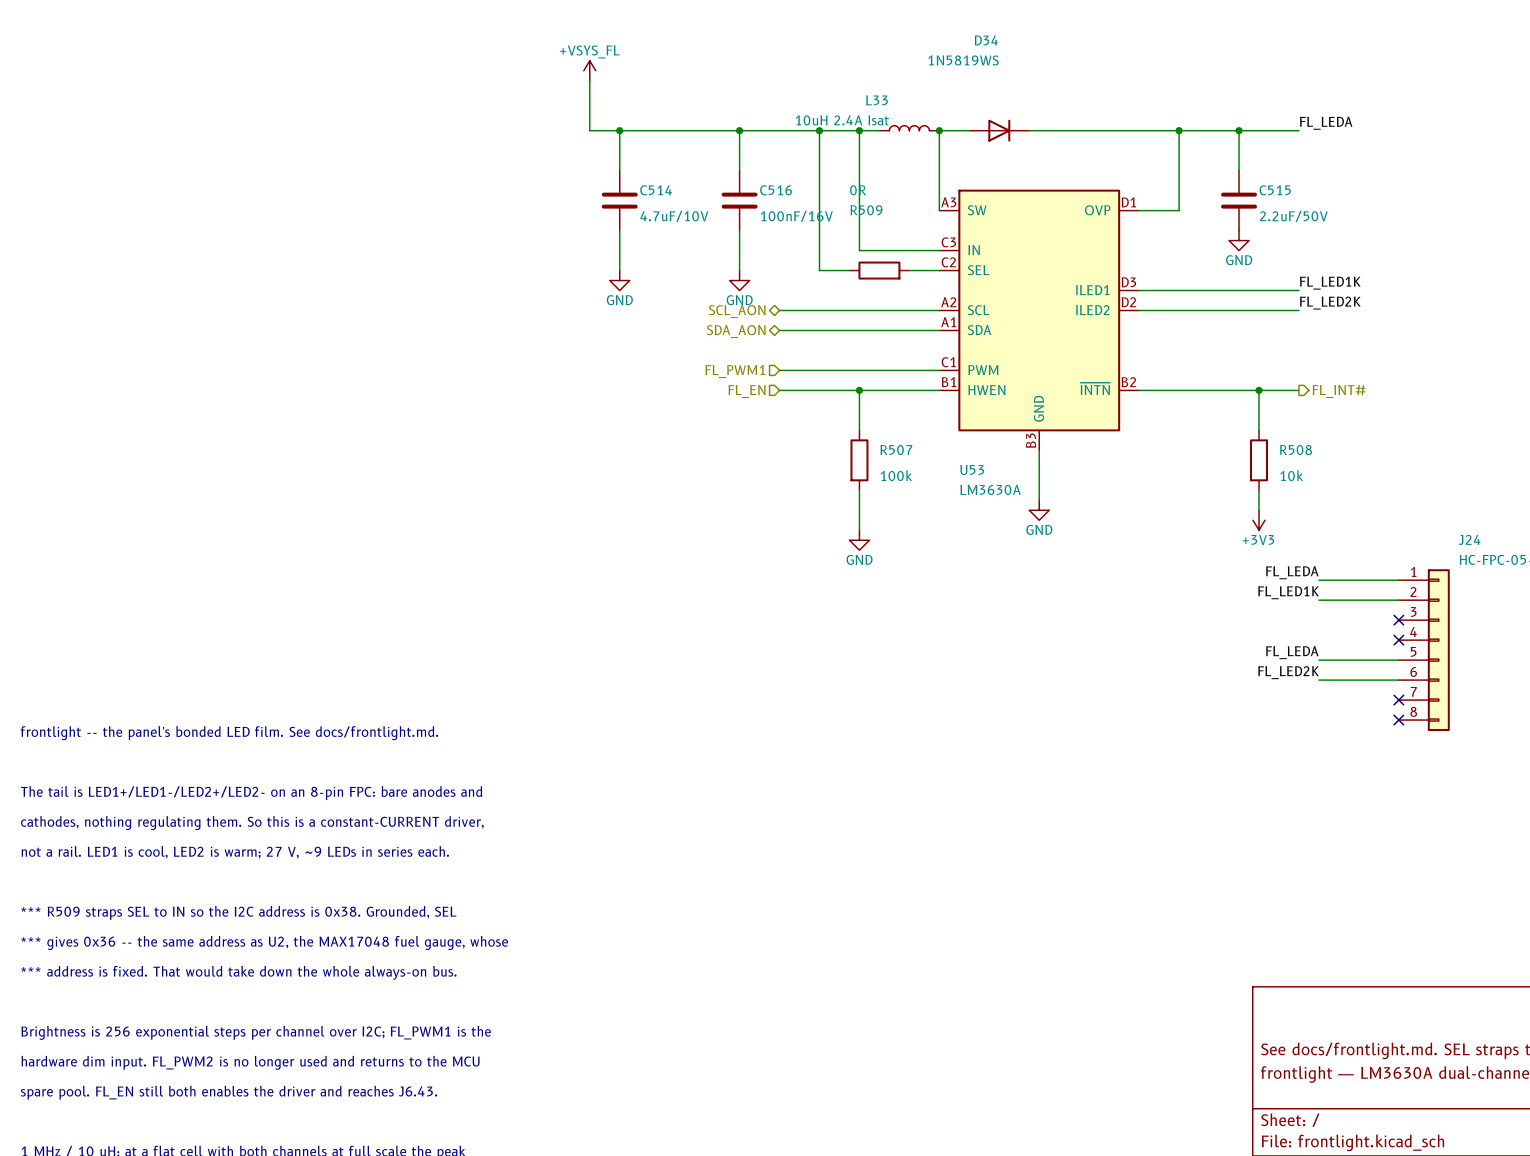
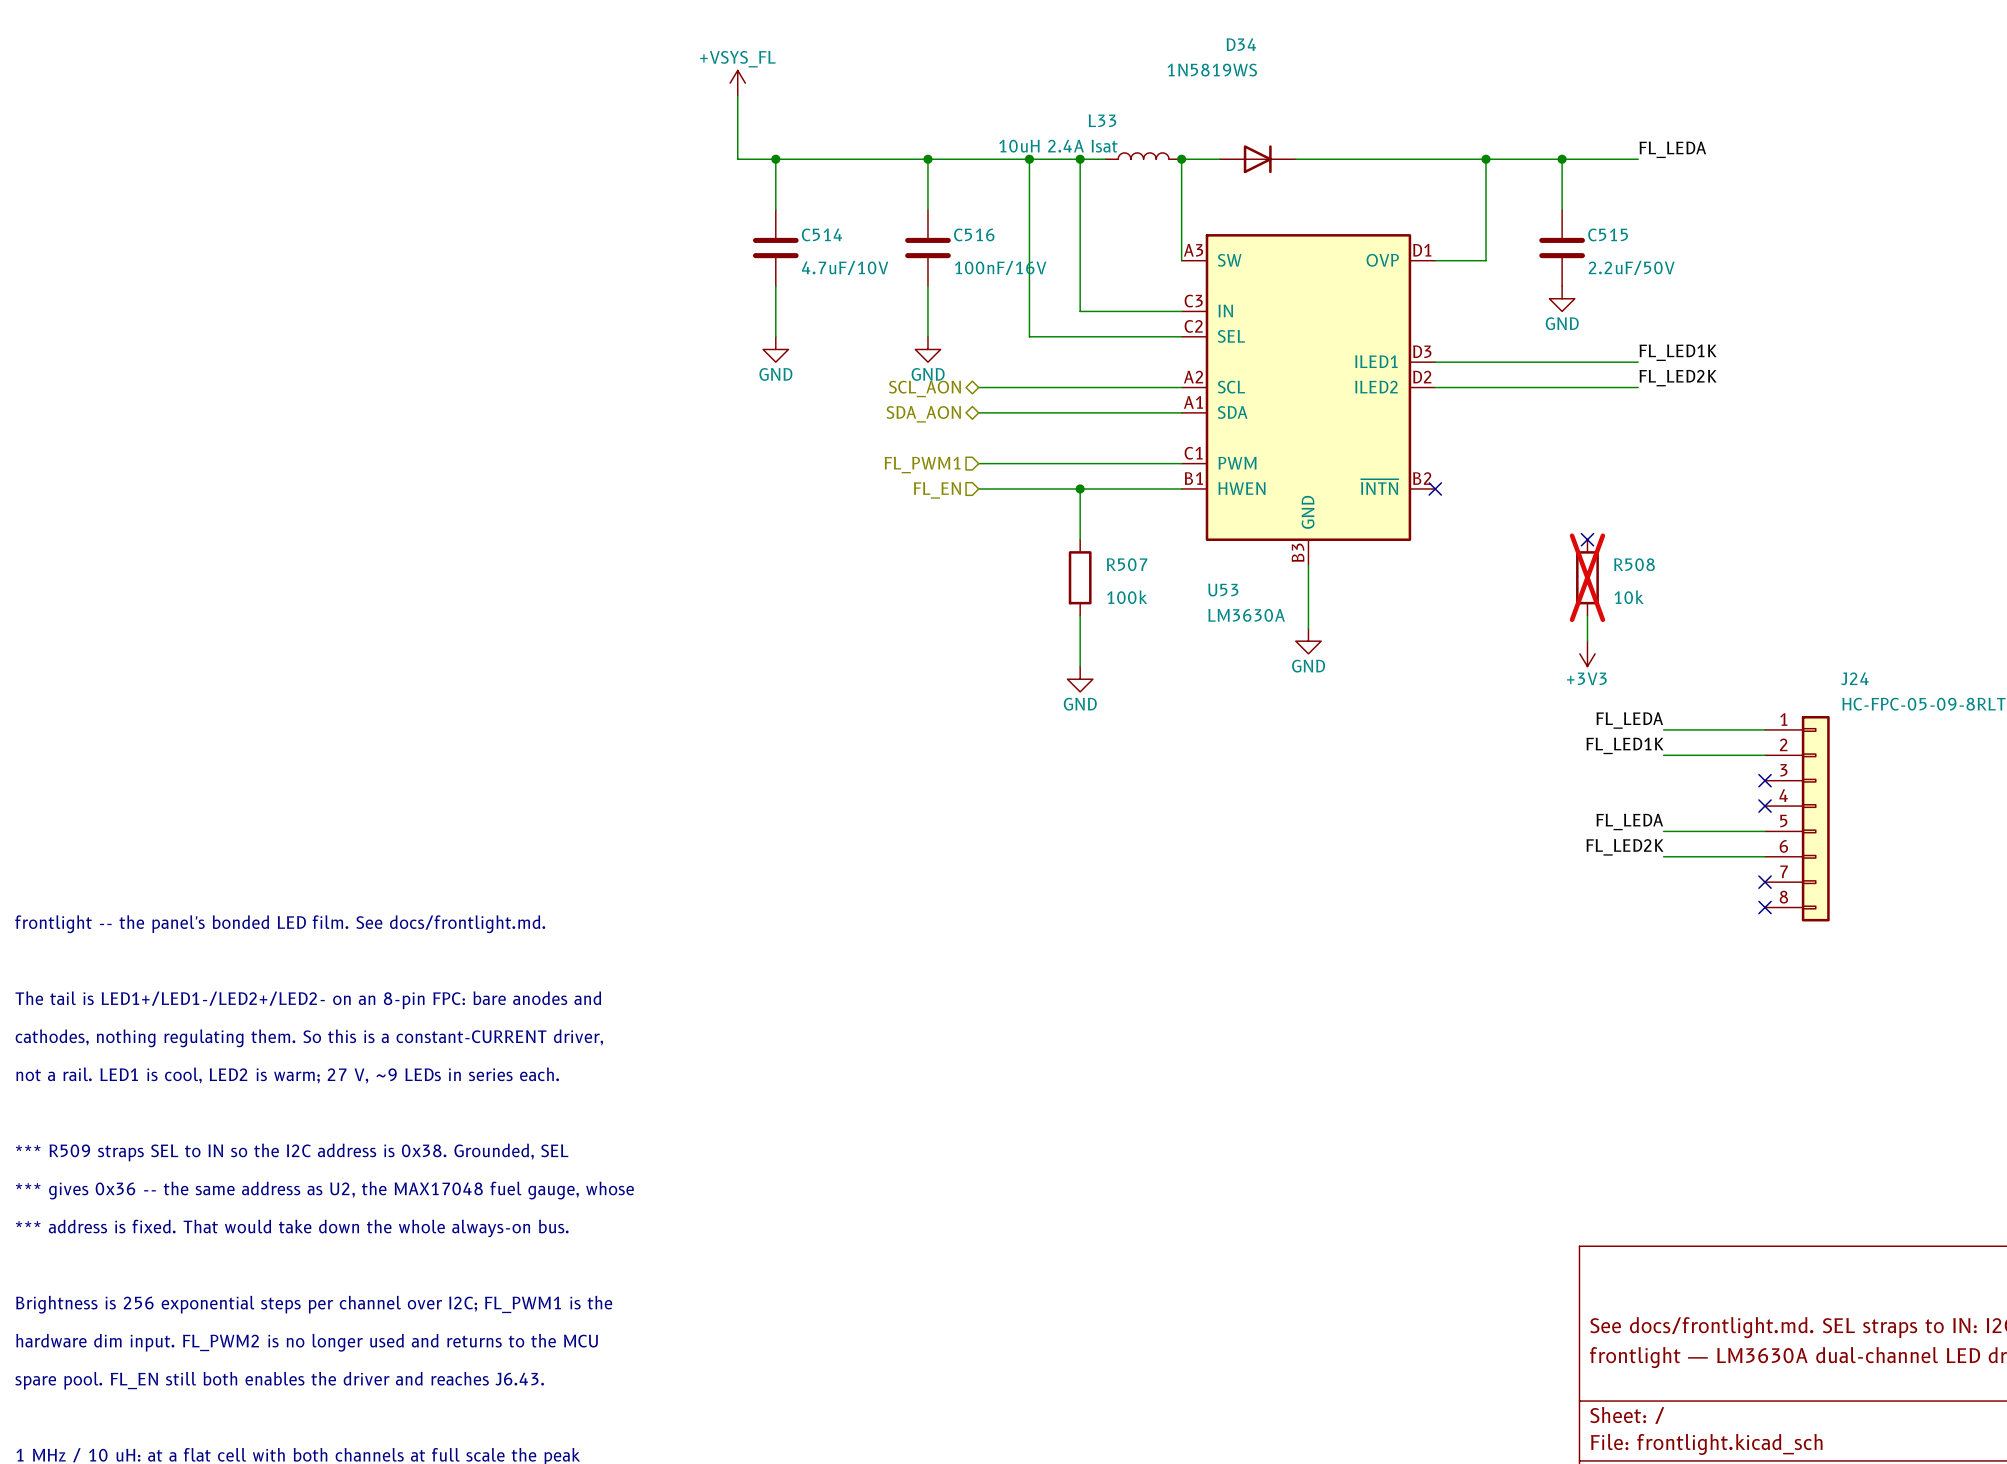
wire: none -> (1067, 336) (1143, 336)
R509: 0R (879, 270) -> none
wire: (1139, 390) (1298, 390) -> none
no-connect mark: none -> (1435, 488)
wire: (1259, 390) (1259, 430) -> none
junction: (1259, 390) -> none
hierarchical label: FL_INT# (1339, 391) -> none
no-connect mark: none -> (1587, 539)
R508 do-not-place cross: none -> (1587, 577)

